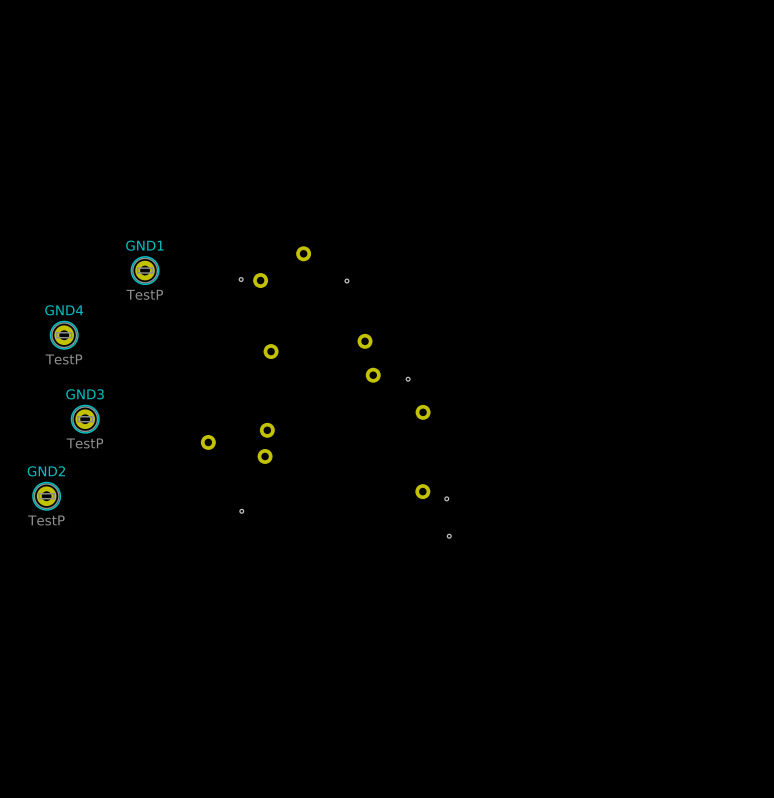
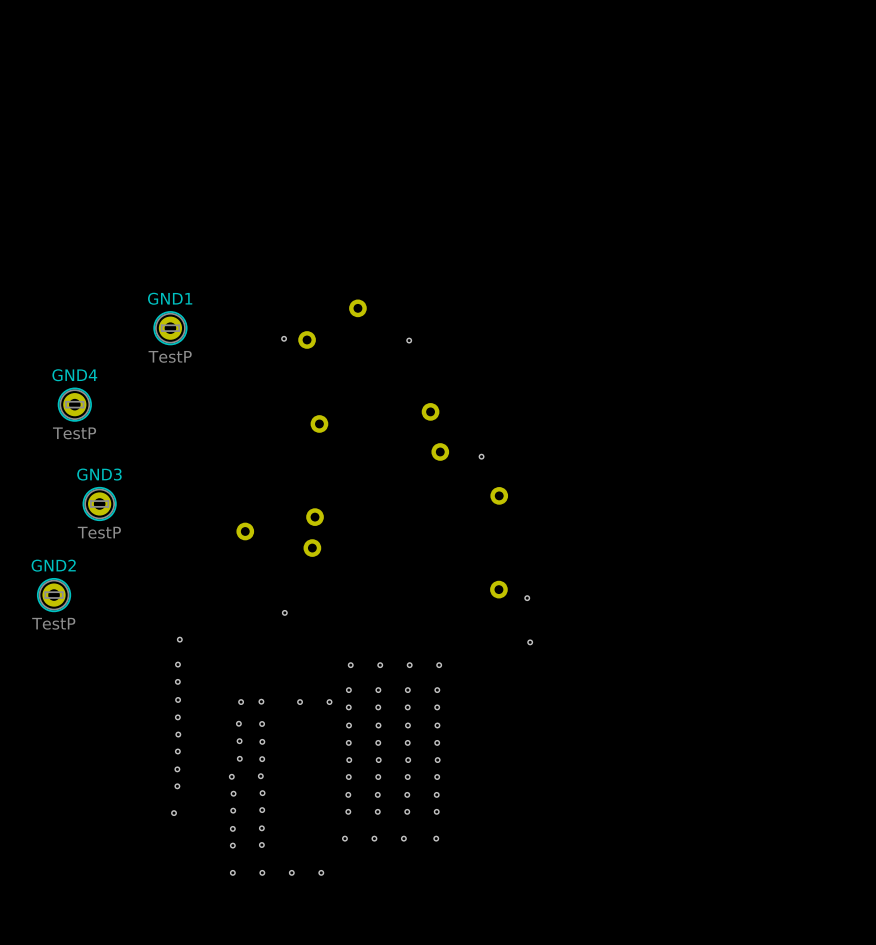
via: none -> (179, 639)
via: none -> (177, 664)
via: none -> (350, 665)
via: none -> (380, 665)
via: none -> (409, 665)
via: none -> (439, 665)
via: none -> (177, 681)
via: none -> (348, 690)
via: none -> (378, 690)
via: none -> (407, 690)
via: none -> (437, 690)
via: none -> (178, 699)
via: none -> (241, 702)
via: none -> (261, 701)
via: none -> (300, 702)
via: none -> (329, 702)
via: none -> (348, 707)
via: none -> (378, 707)
via: none -> (407, 707)
via: none -> (437, 707)
via: none -> (177, 717)
via: none -> (238, 723)
via: none -> (262, 723)
via: none -> (349, 725)
via: none -> (378, 725)
via: none -> (407, 725)
via: none -> (437, 725)
via: none -> (178, 734)
via: none -> (239, 741)
via: none -> (262, 741)
via: none -> (348, 742)
via: none -> (378, 742)
via: none -> (407, 742)
via: none -> (437, 742)
via: none -> (177, 751)
via: none -> (239, 758)
via: none -> (262, 759)
via: none -> (349, 760)
via: none -> (378, 760)
via: none -> (408, 760)
via: none -> (437, 760)
via: none -> (177, 769)
via: none -> (231, 776)
via: none -> (260, 776)
via: none -> (348, 777)
via: none -> (378, 777)
via: none -> (407, 777)
via: none -> (437, 777)
via: none -> (177, 786)
via: none -> (262, 793)
via: none -> (233, 793)
via: none -> (348, 794)
via: none -> (377, 794)
via: none -> (407, 794)
via: none -> (436, 794)
via: none -> (233, 810)
via: none -> (262, 810)
via: none -> (348, 811)
via: none -> (377, 811)
via: none -> (407, 811)
via: none -> (436, 811)
via: none -> (174, 813)
via: none -> (232, 828)
via: none -> (261, 828)
via: none -> (344, 838)
via: none -> (374, 838)
via: none -> (403, 838)
via: none -> (436, 838)
via: none -> (261, 845)
via: none -> (232, 845)
via: none -> (232, 872)
via: none -> (262, 872)
via: none -> (291, 872)
via: none -> (321, 872)

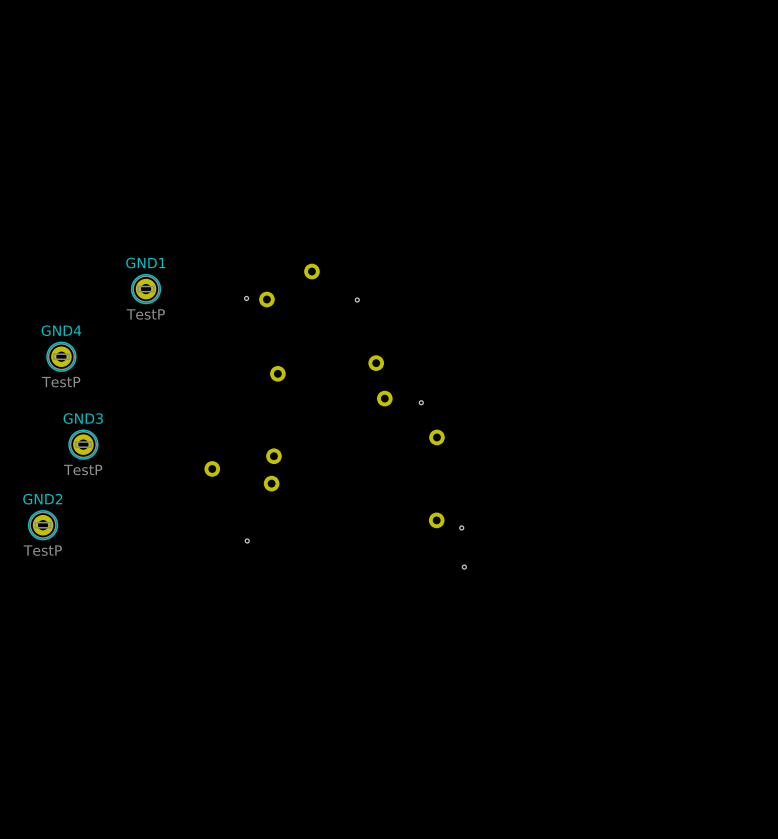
via: (179, 639) -> none
via: (177, 664) -> none
via: (350, 665) -> none
via: (380, 665) -> none
via: (409, 665) -> none
via: (439, 665) -> none
via: (177, 681) -> none
via: (348, 690) -> none
via: (378, 690) -> none
via: (407, 690) -> none
via: (437, 690) -> none
via: (178, 699) -> none
via: (261, 701) -> none
via: (241, 702) -> none
via: (300, 702) -> none
via: (329, 702) -> none
via: (348, 707) -> none
via: (378, 707) -> none
via: (407, 707) -> none
via: (437, 707) -> none
via: (177, 717) -> none
via: (238, 723) -> none
via: (262, 723) -> none
via: (349, 725) -> none
via: (378, 725) -> none
via: (407, 725) -> none
via: (437, 725) -> none
via: (178, 734) -> none
via: (239, 741) -> none
via: (262, 741) -> none
via: (348, 742) -> none
via: (378, 742) -> none
via: (407, 742) -> none
via: (437, 742) -> none
via: (177, 751) -> none
via: (239, 758) -> none
via: (262, 759) -> none
via: (349, 760) -> none
via: (378, 760) -> none
via: (408, 760) -> none
via: (437, 760) -> none
via: (177, 769) -> none
via: (231, 776) -> none
via: (260, 776) -> none
via: (348, 777) -> none
via: (378, 777) -> none
via: (407, 777) -> none
via: (437, 777) -> none
via: (177, 786) -> none
via: (233, 793) -> none
via: (262, 793) -> none
via: (348, 794) -> none
via: (377, 794) -> none
via: (407, 794) -> none
via: (436, 794) -> none
via: (233, 810) -> none
via: (262, 810) -> none
via: (348, 811) -> none
via: (377, 811) -> none
via: (407, 811) -> none
via: (436, 811) -> none
via: (174, 813) -> none
via: (232, 828) -> none
via: (261, 828) -> none
via: (344, 838) -> none
via: (374, 838) -> none
via: (403, 838) -> none
via: (436, 838) -> none
via: (232, 845) -> none
via: (261, 845) -> none
via: (232, 872) -> none
via: (262, 872) -> none
via: (291, 872) -> none
via: (321, 872) -> none

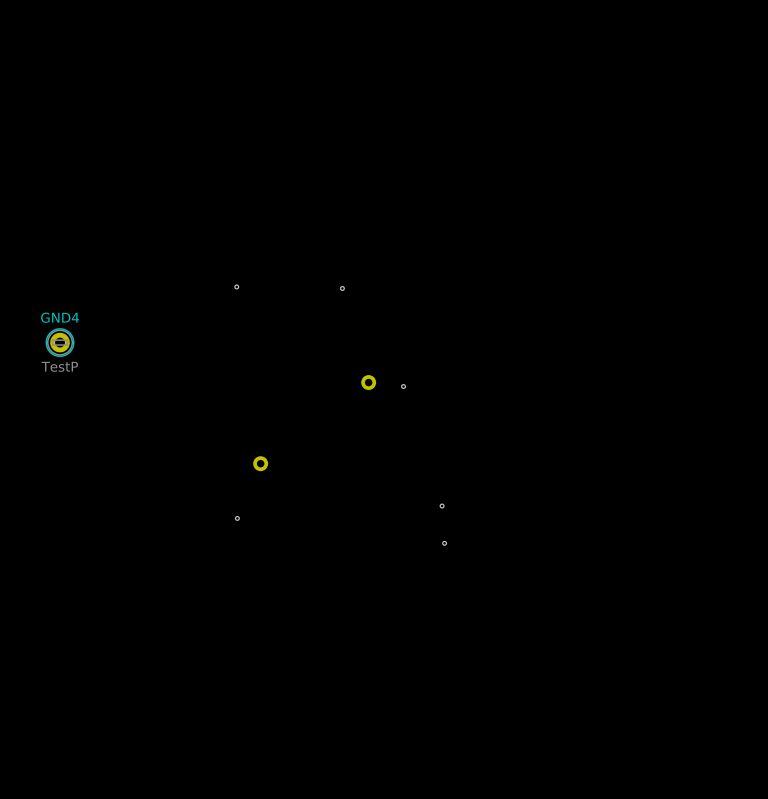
part: (311, 271) -> none
GND1: TestP (146, 289) -> none
part: (266, 299) -> none
part: (376, 363) -> none
part: (277, 373) -> none
part: (436, 437) -> none
GND3: TestP (83, 444) -> none
part: (273, 456) -> none
part: (212, 468) -> none
part: (436, 520) -> none
GND2: TestP (43, 525) -> none

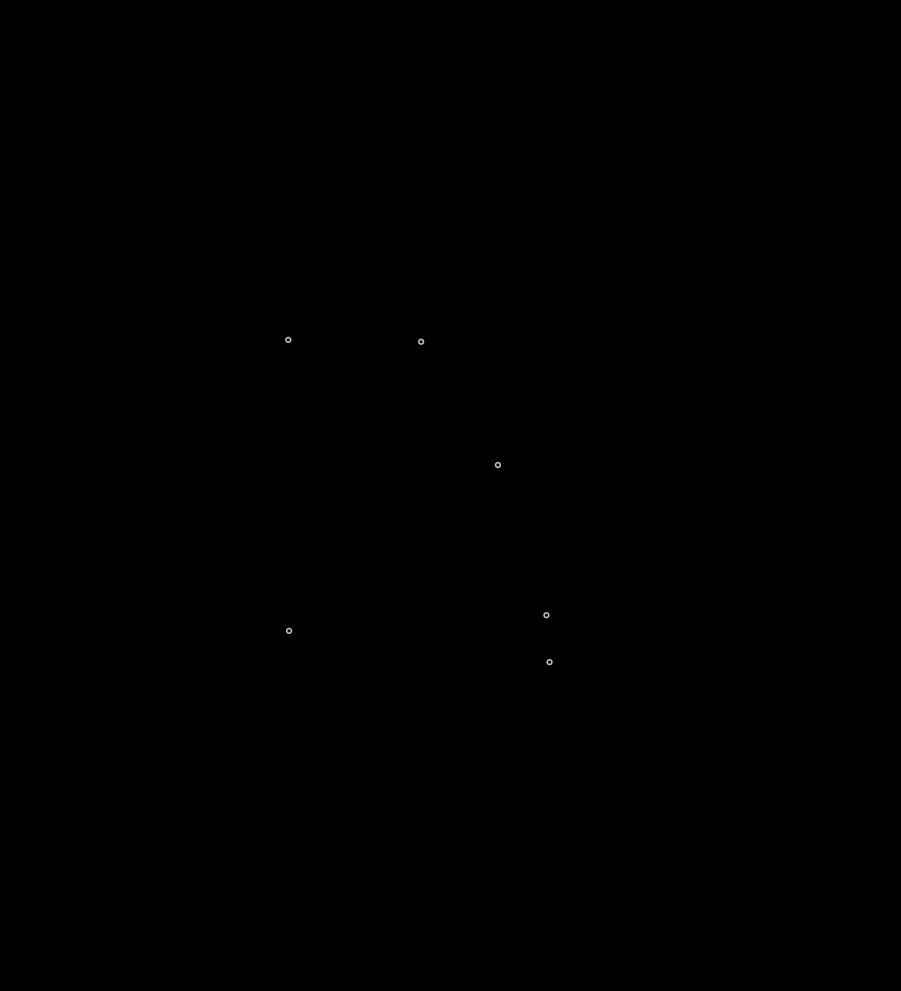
GND4: TestP (60, 342) -> none
part: (368, 382) -> none
part: (260, 463) -> none

